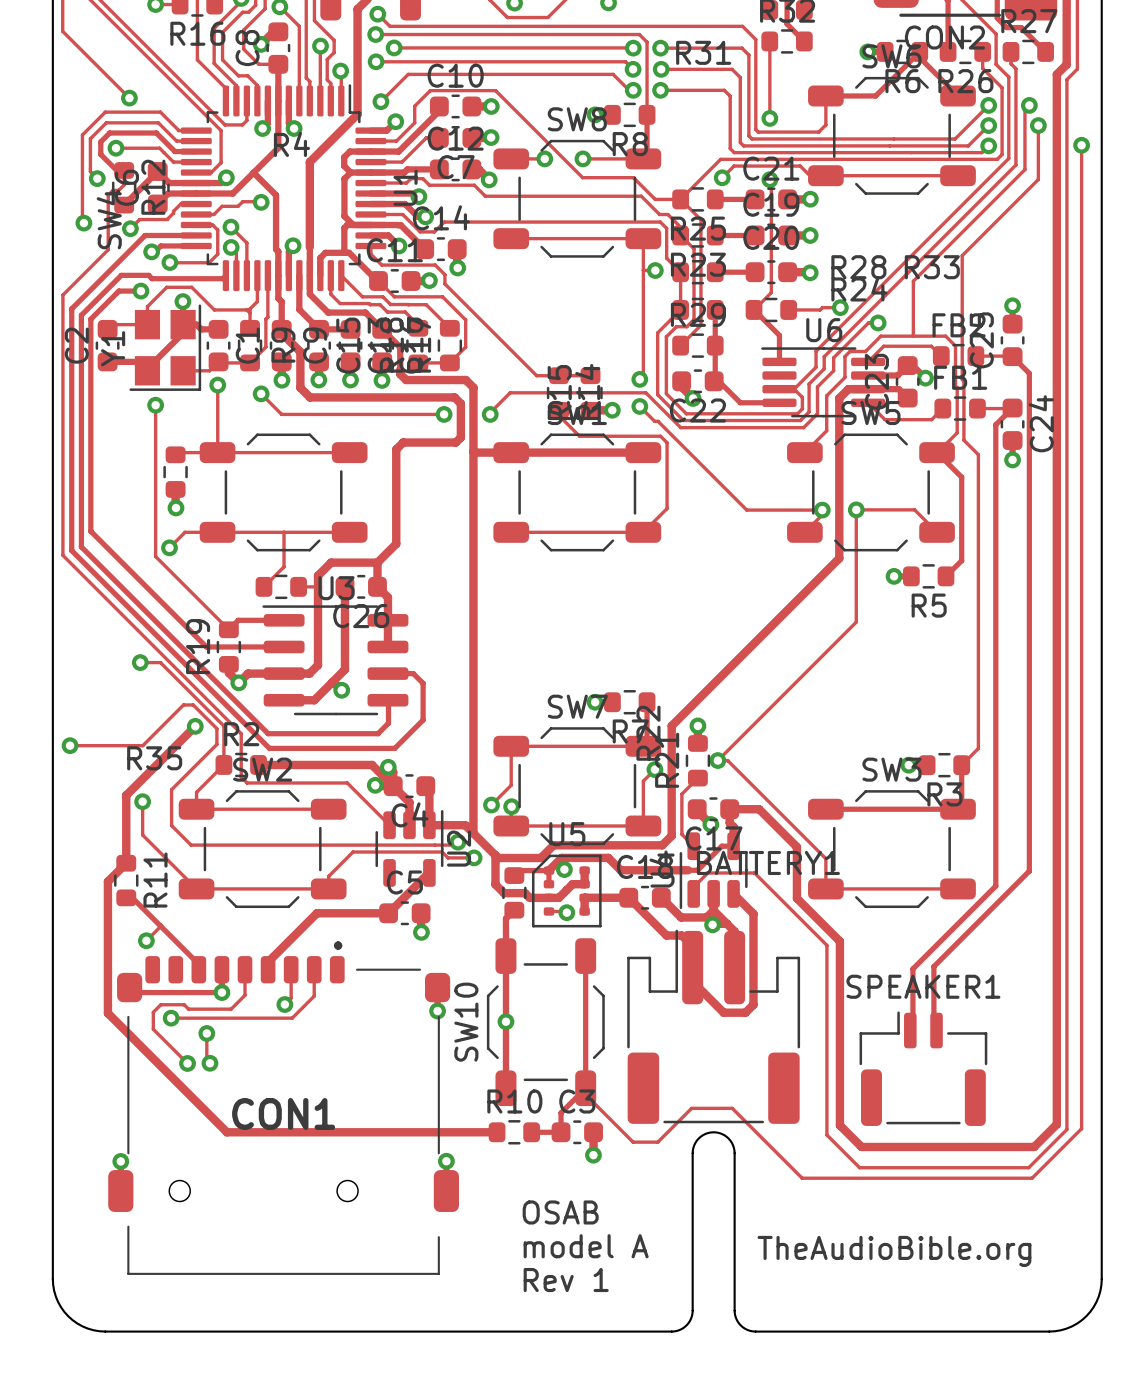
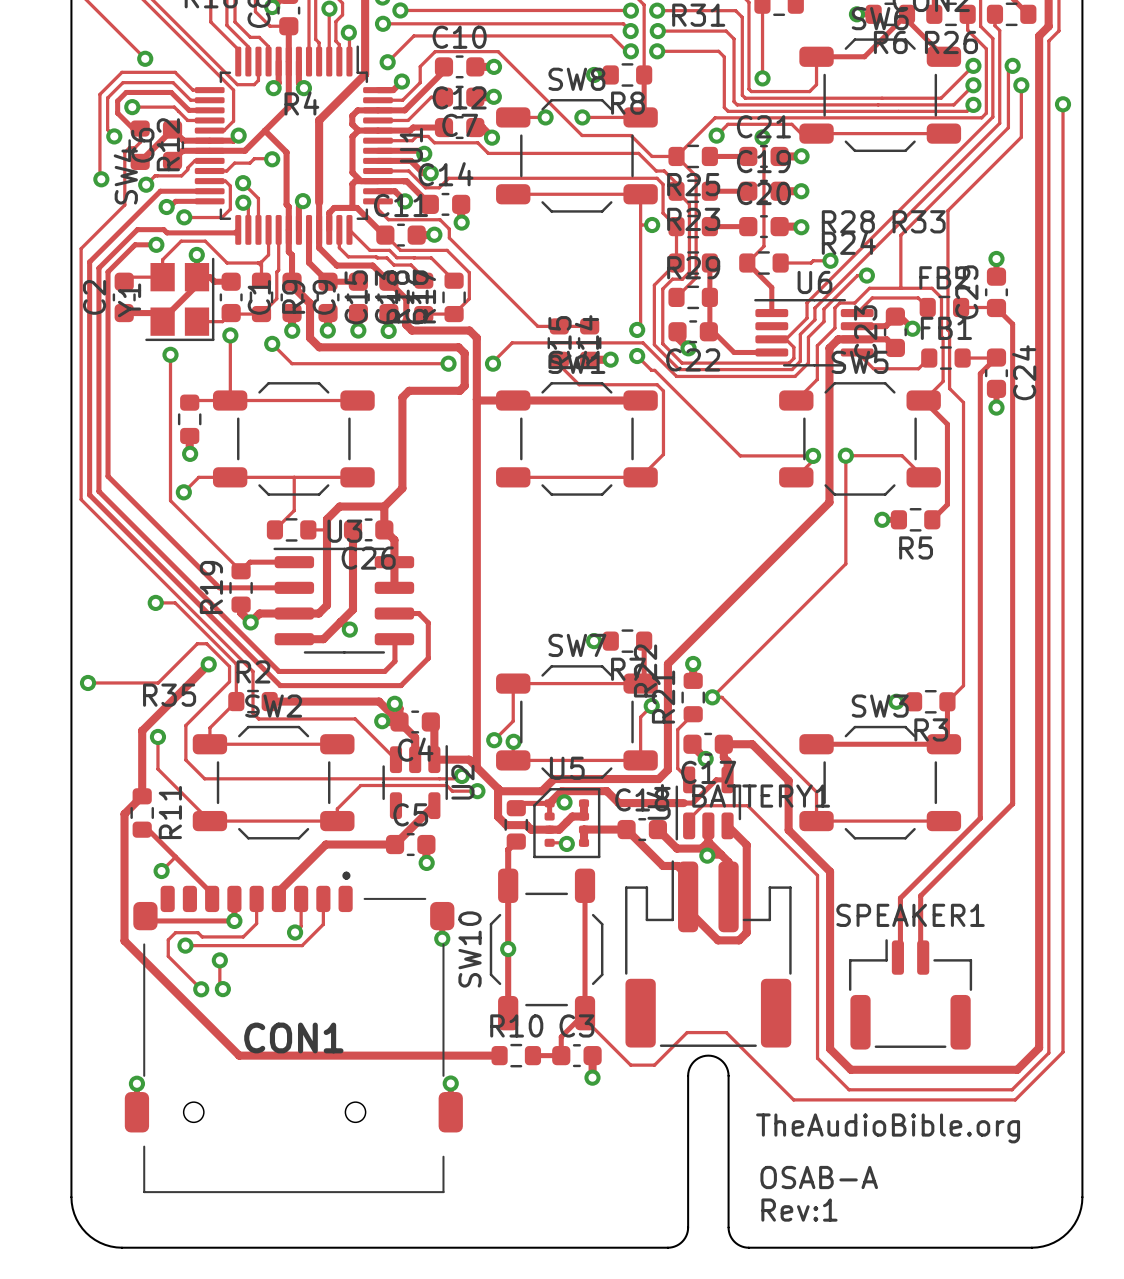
text: OSAB (560, 1212) -> none
text: model A (586, 1246) -> none
text position: TheAudioBible.org (894, 1251) -> TheAudioBible.org (888, 1128)
text: none -> OSAB-A (819, 1177)
text: Rev 1 (566, 1280) -> none
text: none -> Rev:1 (799, 1210)

